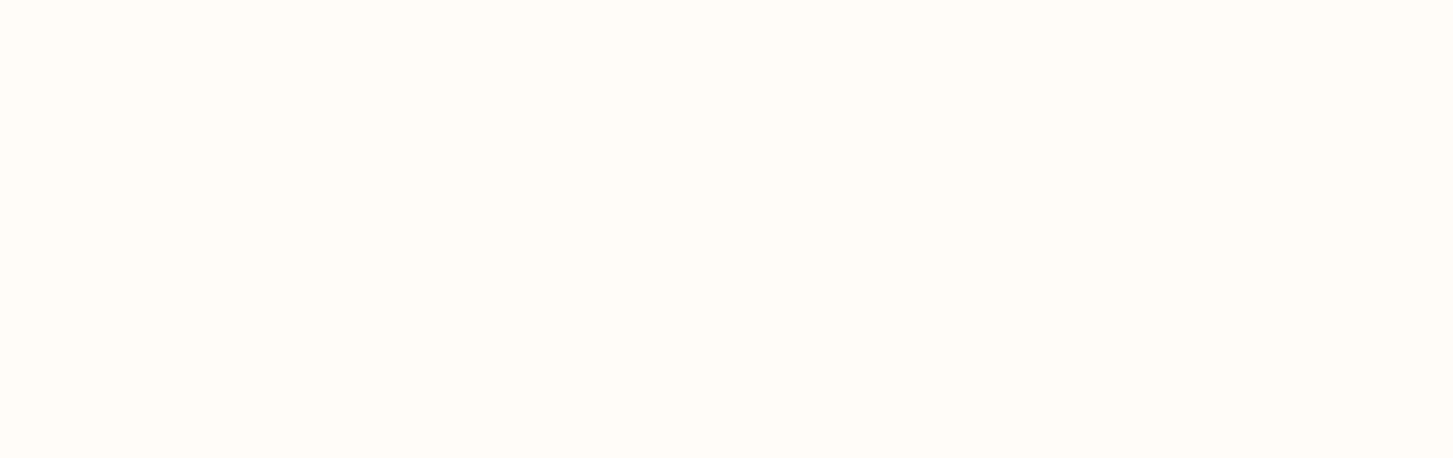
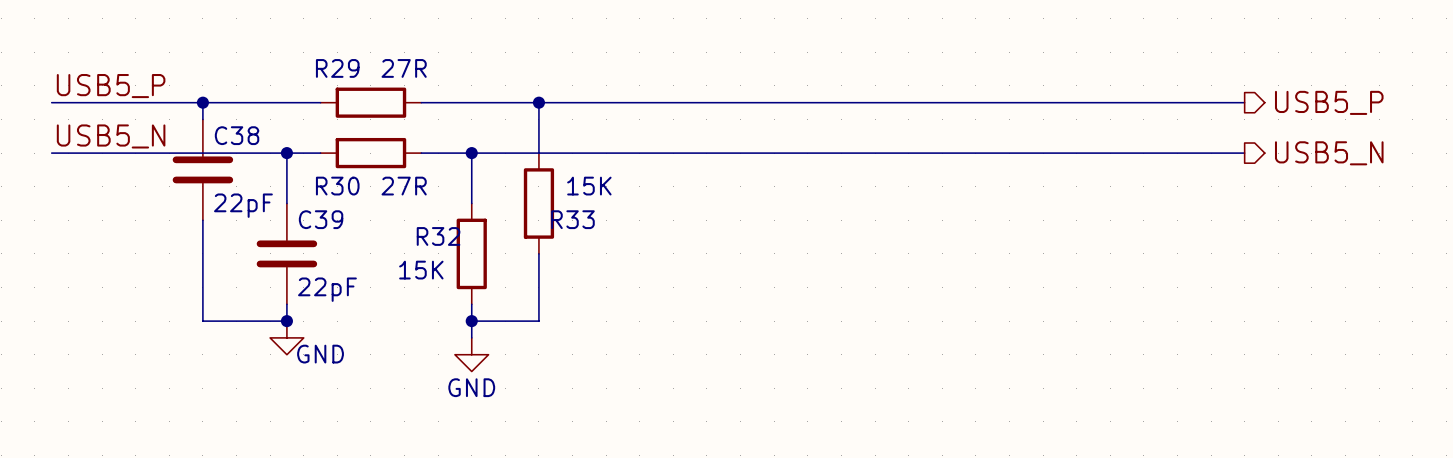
label: none -> USB5_P (111, 86)
wire: none -> (51, 102) (320, 102)
wire: none -> (202, 102) (202, 119)
junction: none -> (202, 102)
R29: none -> 27R (370, 102)
wire: none -> (421, 102) (1244, 102)
wire: none -> (538, 102) (538, 153)
junction: none -> (538, 102)
hierarchical label: none -> USB5_P (1329, 102)
label: none -> USB5_N (111, 136)
wire: none -> (51, 153) (320, 153)
wire: none -> (286, 153) (286, 203)
junction: none -> (286, 153)
R30: none -> 27R (370, 153)
wire: none -> (421, 153) (1244, 153)
wire: none -> (471, 153) (471, 203)
junction: none -> (471, 153)
hierarchical label: none -> USB5_N (1329, 153)
C38: none -> 22pF (202, 169)
R33: none -> 15K (538, 203)
wire: none -> (202, 220) (202, 321) (286, 321) (286, 304)
C39: none -> 22pF (286, 253)
R32: none -> 15K (471, 253)
wire: none -> (538, 253) (538, 321) (471, 321)
wire: none -> (471, 304) (471, 337)
junction: none -> (286, 321)
junction: none -> (471, 321)
power symbol: none -> GND (286, 337)
power symbol: none -> GND (471, 354)

